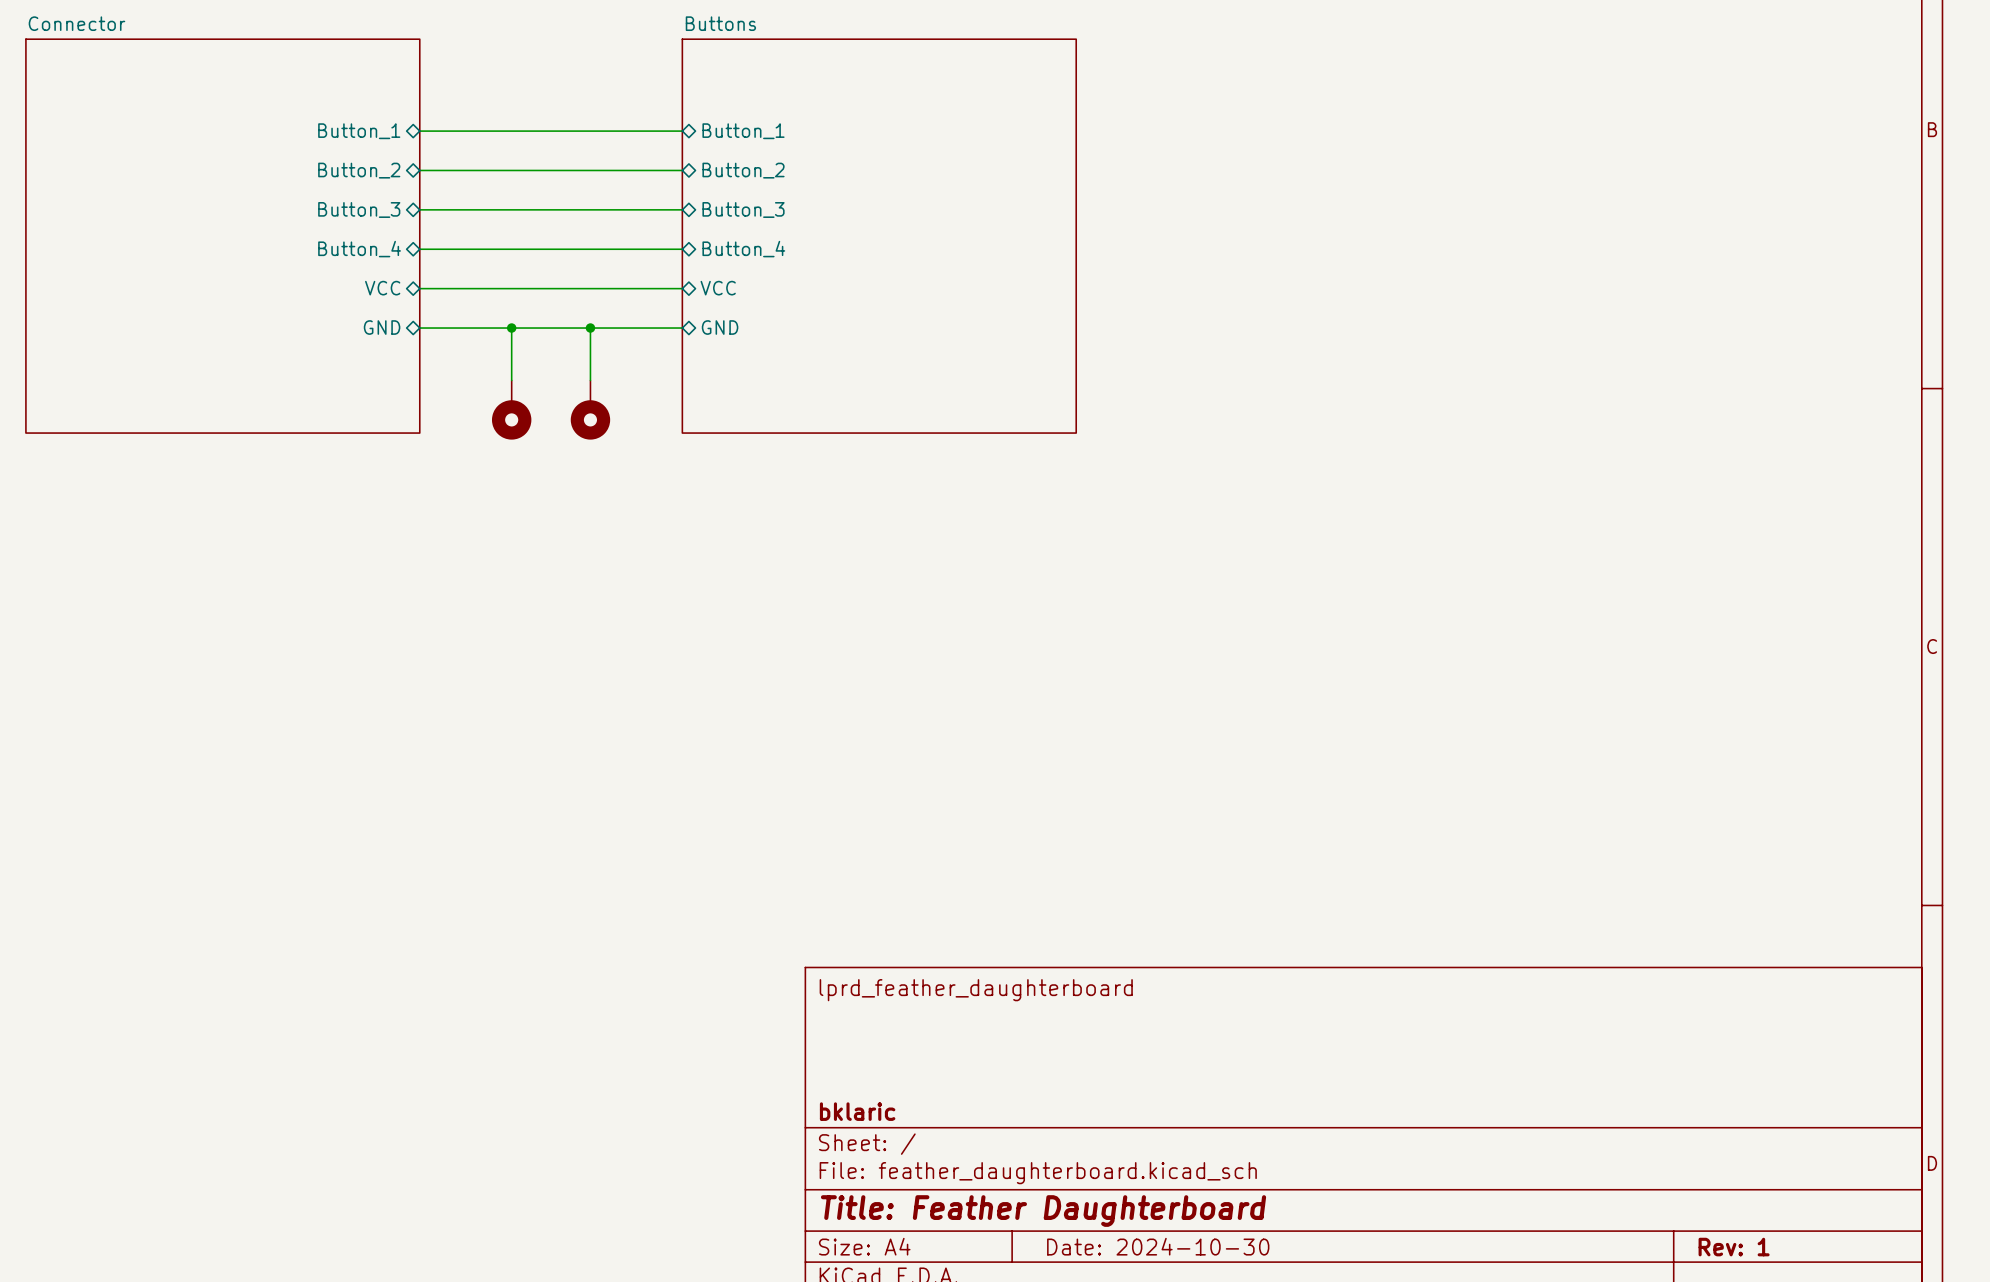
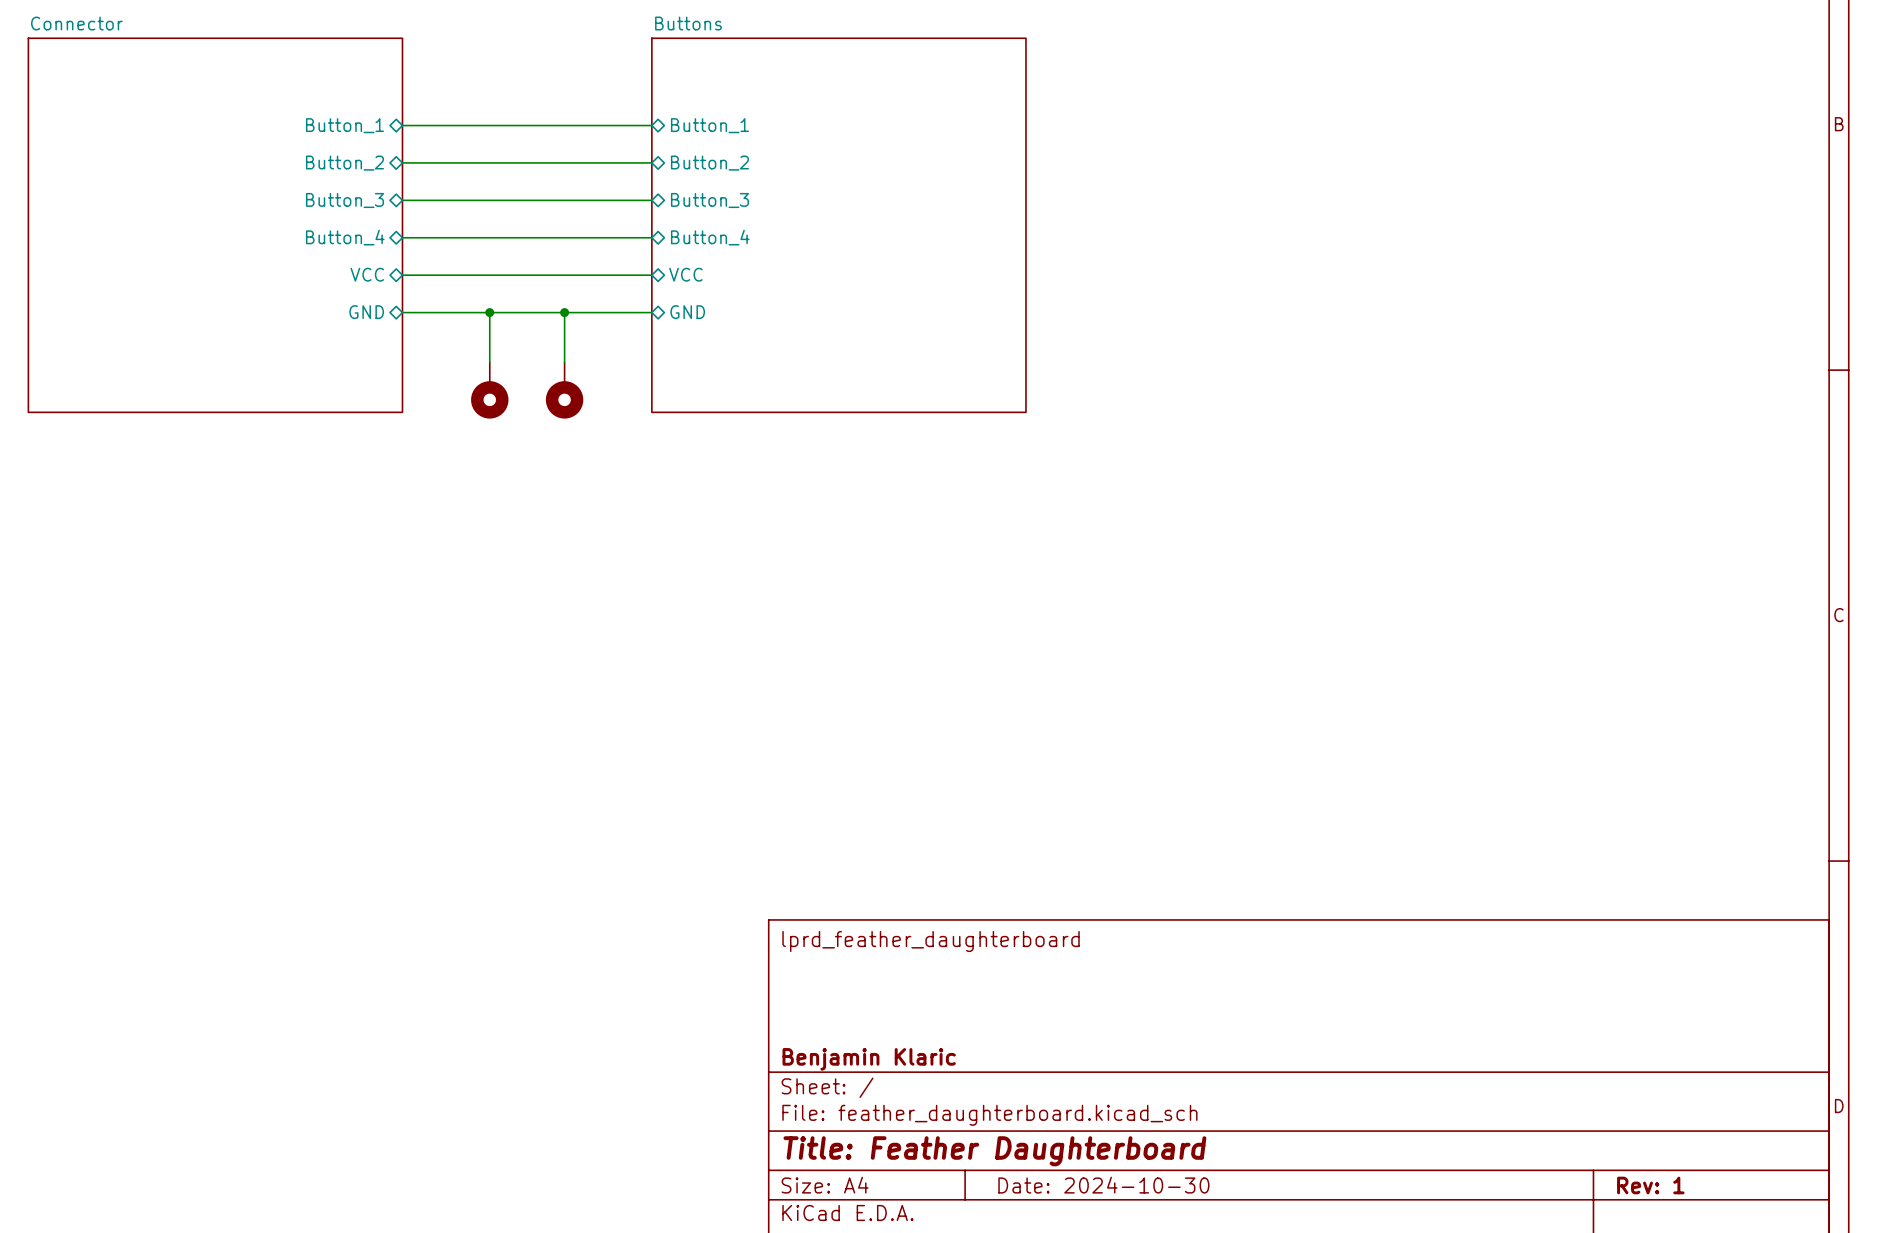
title block: bklaric (857, 1111) -> Benjamin Klaric (869, 1059)

